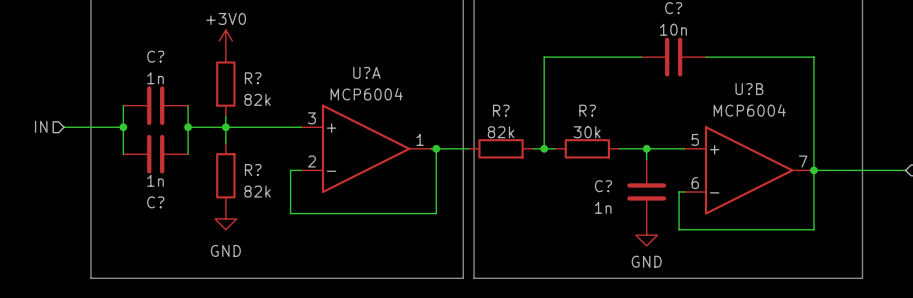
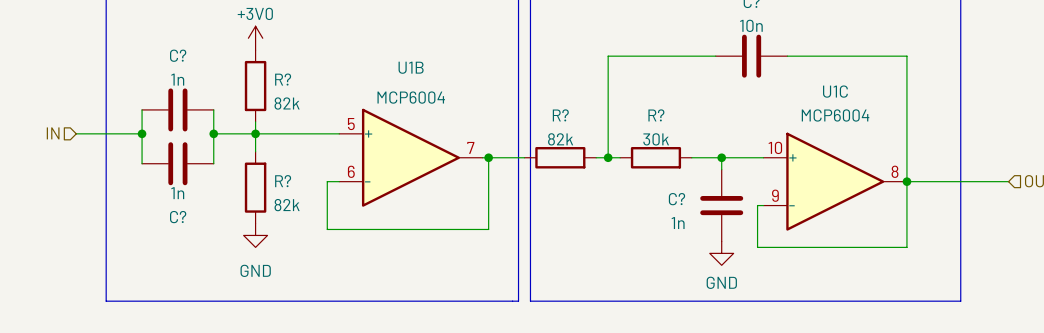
U?A name: U?A (366, 72) -> U1B (411, 67)
U?B name: U?B (749, 89) -> U1C (835, 91)
U?A pin number: 3 (311, 118) -> 5 (351, 124)
U?A pin number: 1 (420, 139) -> 7 (470, 147)
U?B pin number: 5 (695, 139) -> 10 (775, 147)
U?A pin number: 2 (311, 161) -> 6 (351, 171)
U?B pin number: 7 (803, 161) -> 8 (894, 171)
U?B pin number: 6 (695, 183) -> 9 (775, 195)

